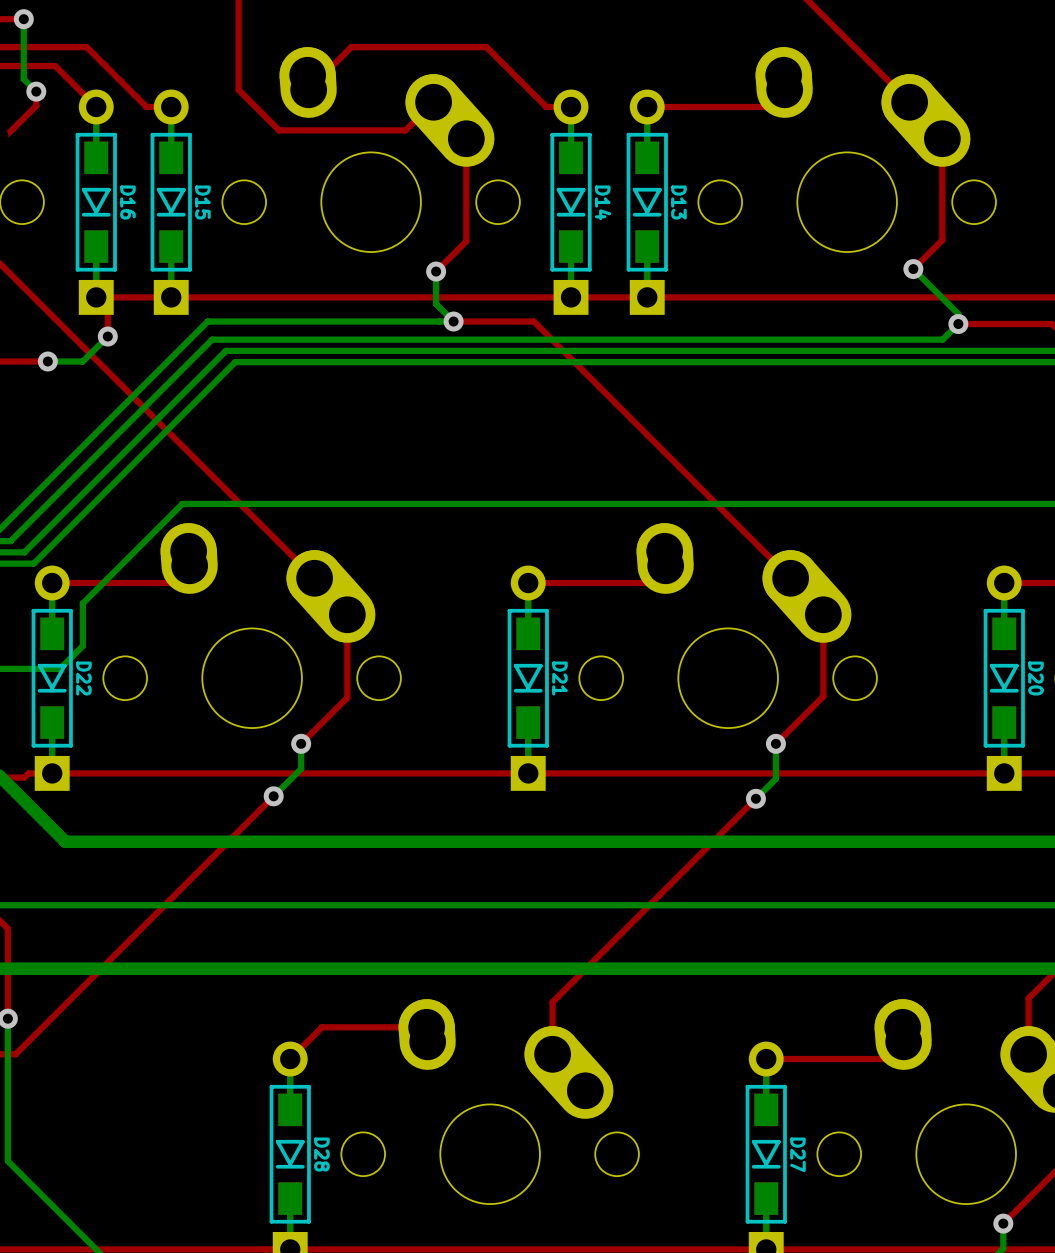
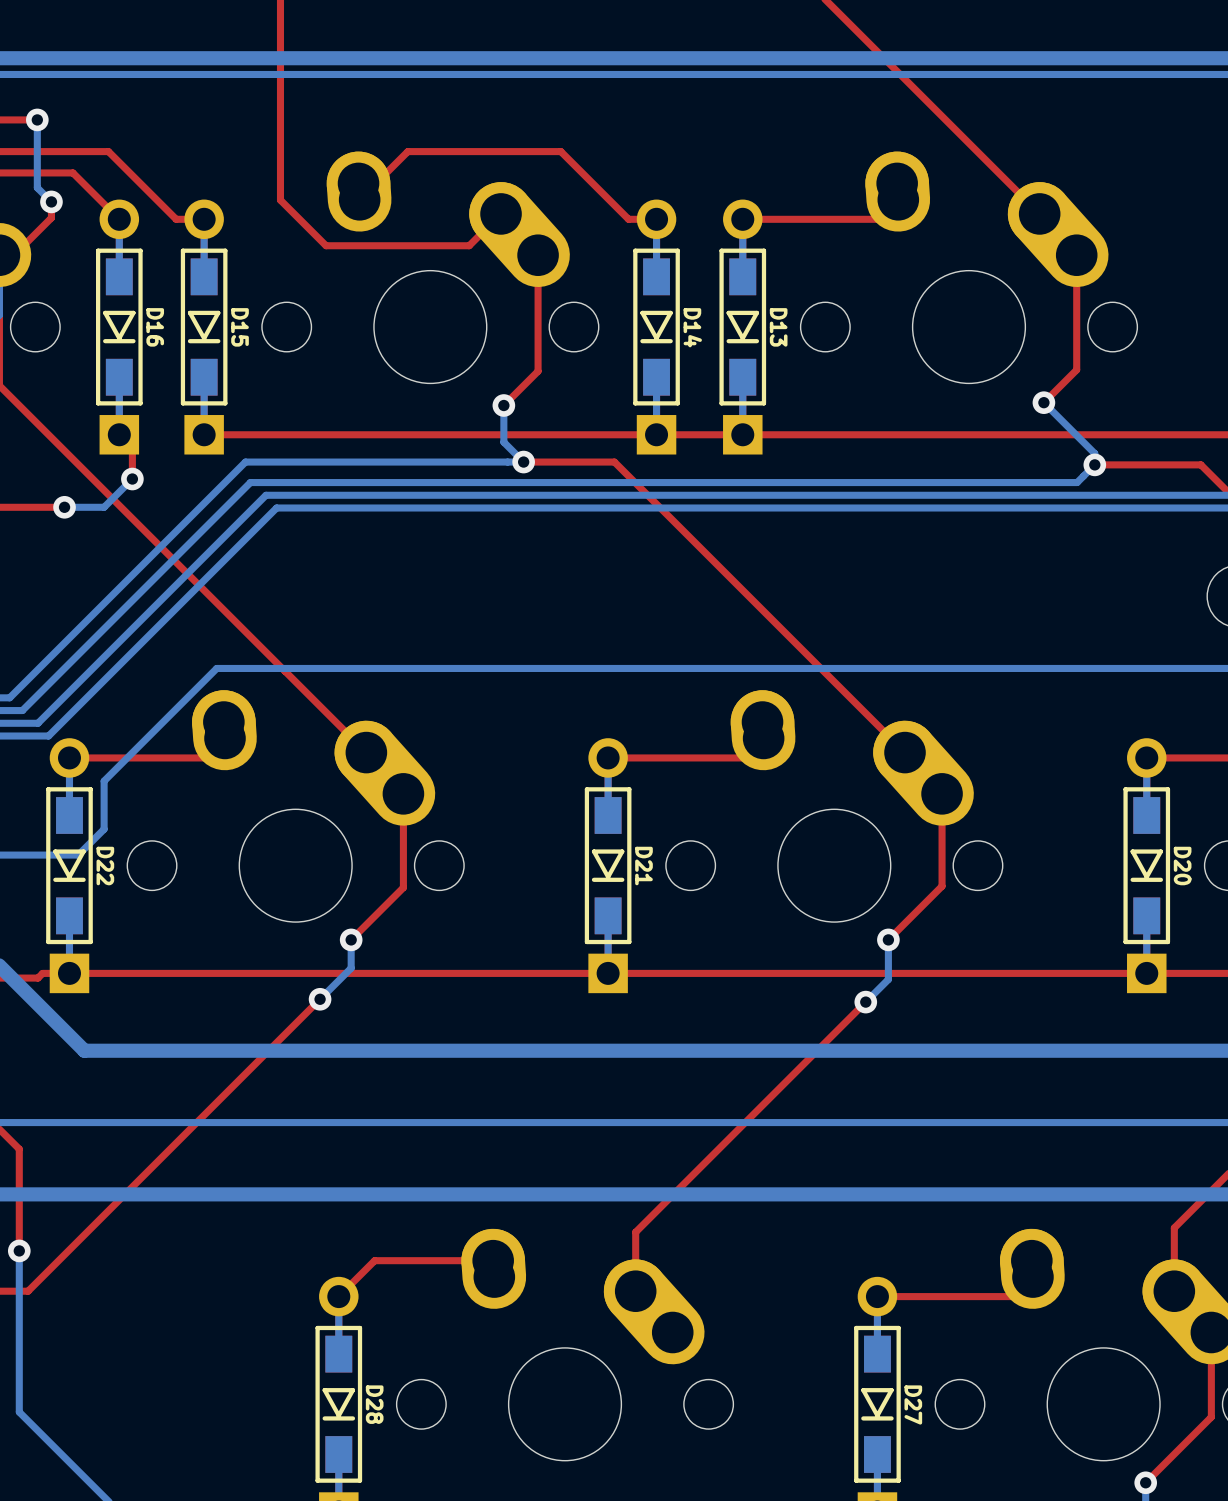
top track: (171, 297) (96, 297) -> none

